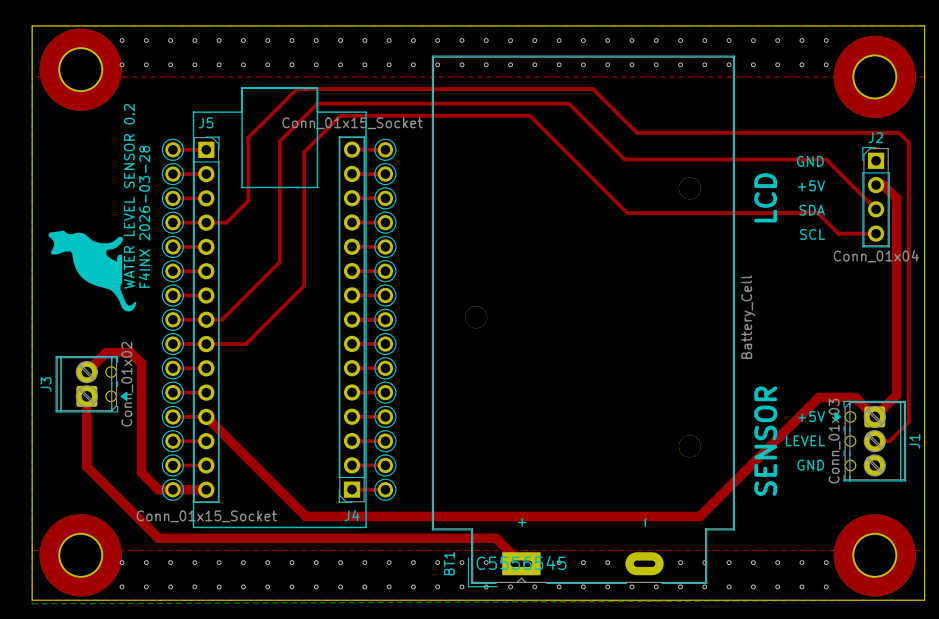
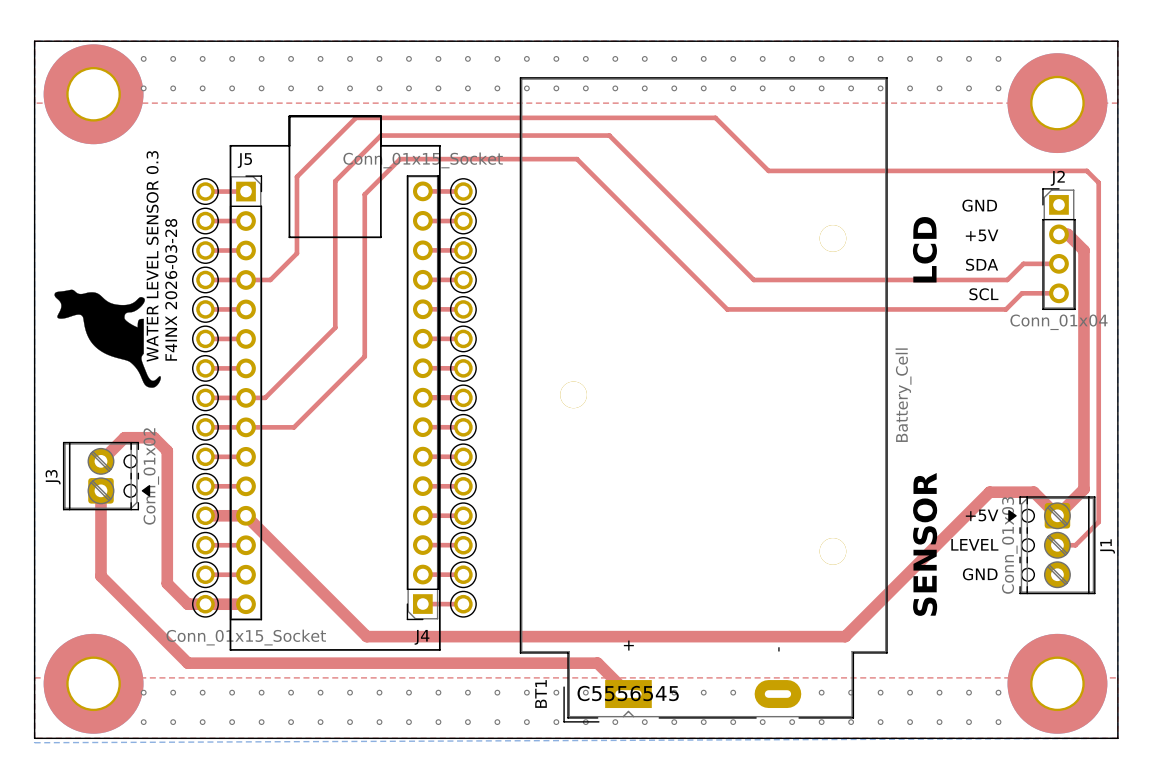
top track: (505, 103) (568, 103) (624, 159) (826, 159) (876, 209) -> (609, 135) (753, 279) (1007, 279) (1023, 263) (1058, 263)
top track: (333, 123) (340, 115) (529, 115) (627, 212) (817, 212) (838, 233) (845, 233) -> (400, 159) (576, 159) (727, 309) (1005, 309) (1022, 293)
text: WATER LEVEL SENSOR 0.2 (129, 196) -> WATER LEVEL SENSOR 0.3 (152, 256)
top track width: thin (172, 416) (206, 416) -> thick (205, 515) (246, 515)

